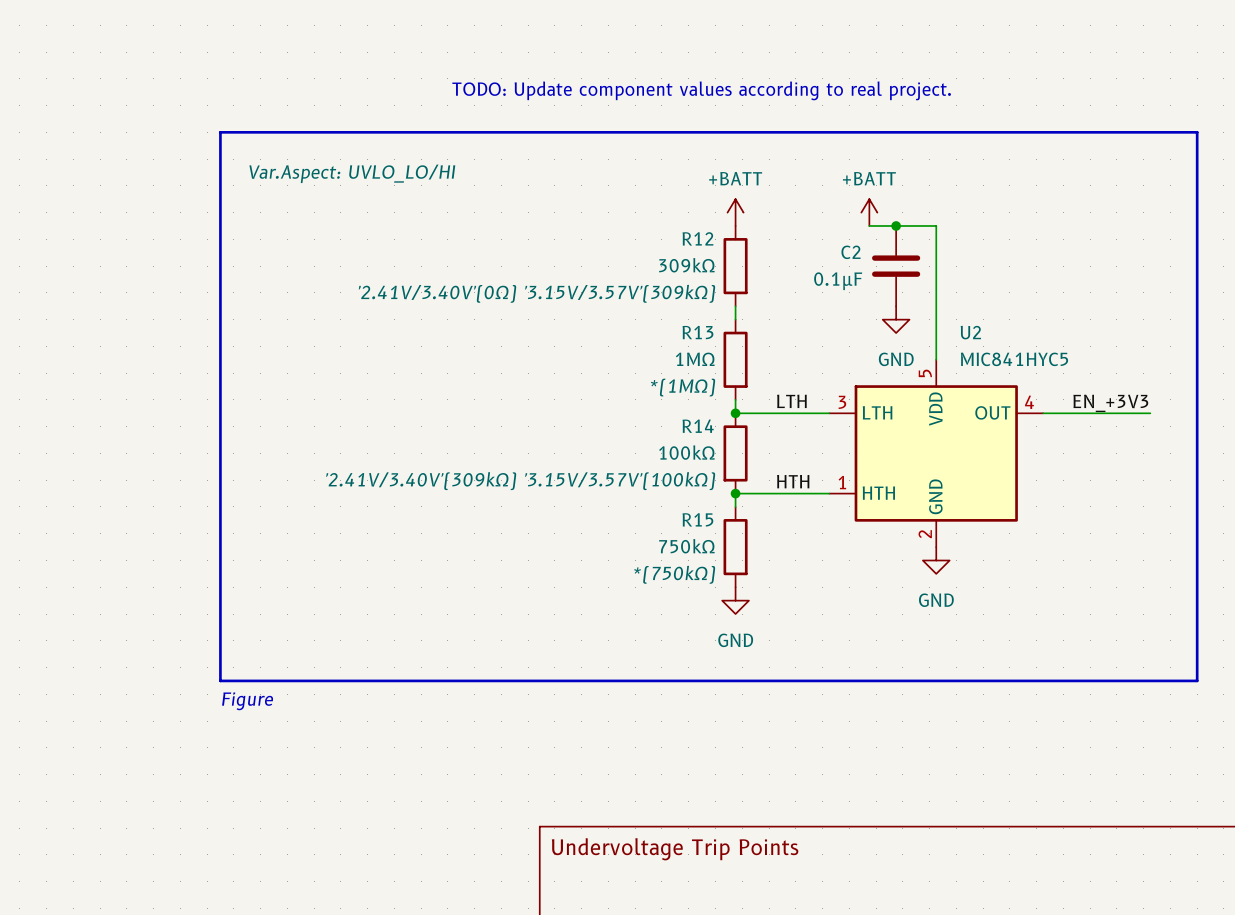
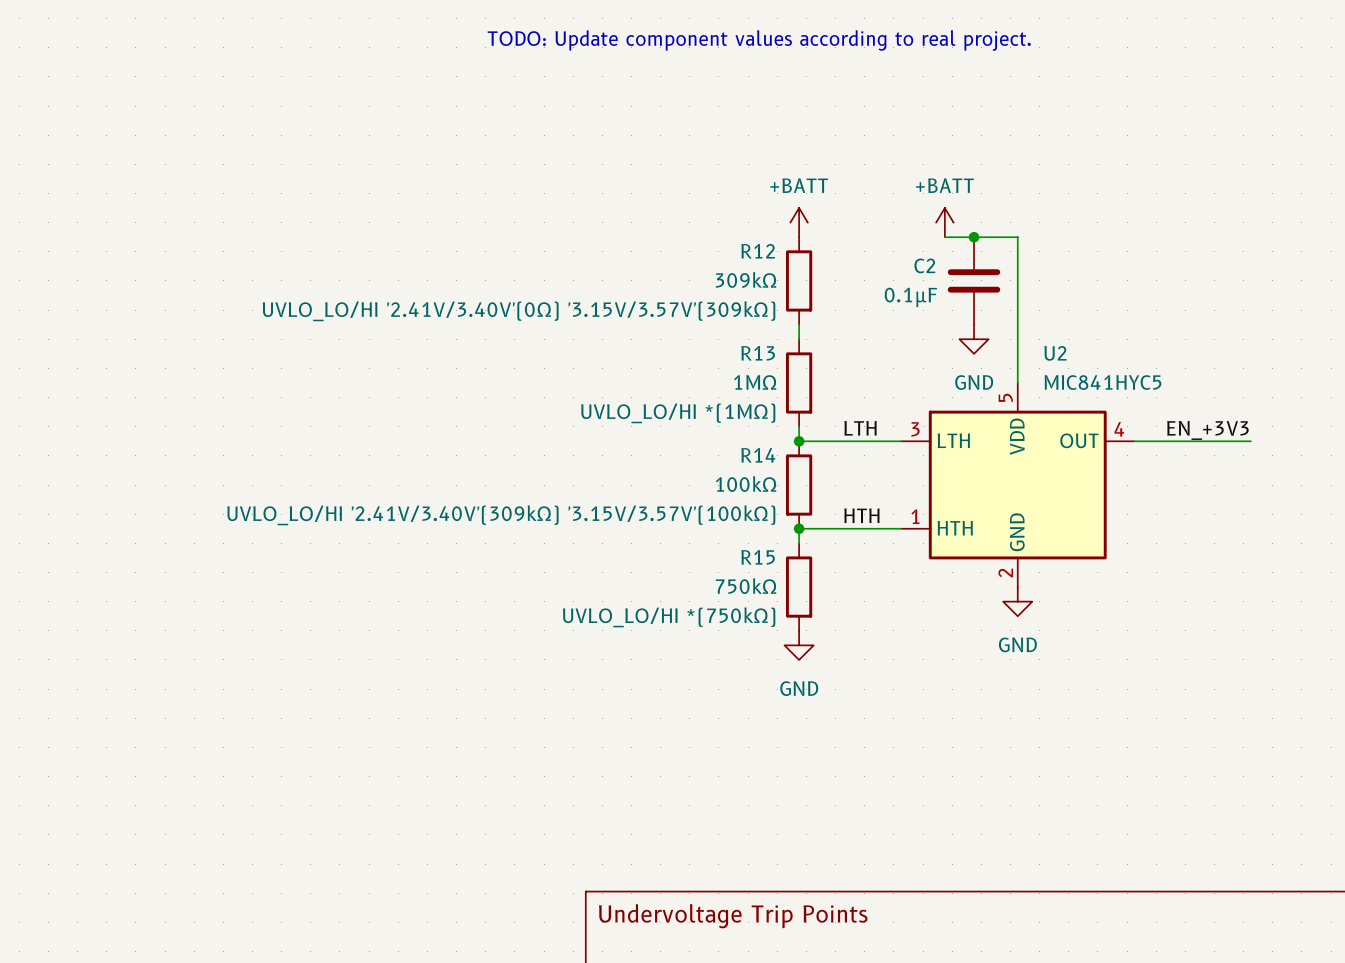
text position: TODO: Update component values according to real project. (701, 90) -> TODO: Update component values according to real project. (759, 40)
line: (220, 132) (1197, 132) (1197, 680) (220, 680) (220, 132) -> none
R12 text: Var.Aspect: UVLO_LO/HI (352, 173) -> none
R12 text: '2.41V/3.40V'(0Ω) '3.15V/3.57V'(309kΩ) (536, 293) -> UVLO_LO/HI '2.41V/3.40V'(0Ω) '3.15V/3.57V'(309kΩ) (519, 311)
R13 text: *(1MΩ) (683, 387) -> UVLO_LO/HI *(1MΩ) (678, 413)
R14 text: '2.41V/3.40V'(309kΩ) '3.15V/3.57V'(100kΩ) (520, 481) -> UVLO_LO/HI '2.41V/3.40V'(309kΩ) '3.15V/3.57V'(100kΩ) (501, 515)
R15 text: *(750kΩ) (674, 574) -> UVLO_LO/HI *(750kΩ) (669, 617)
text: Figure (247, 701) -> none

